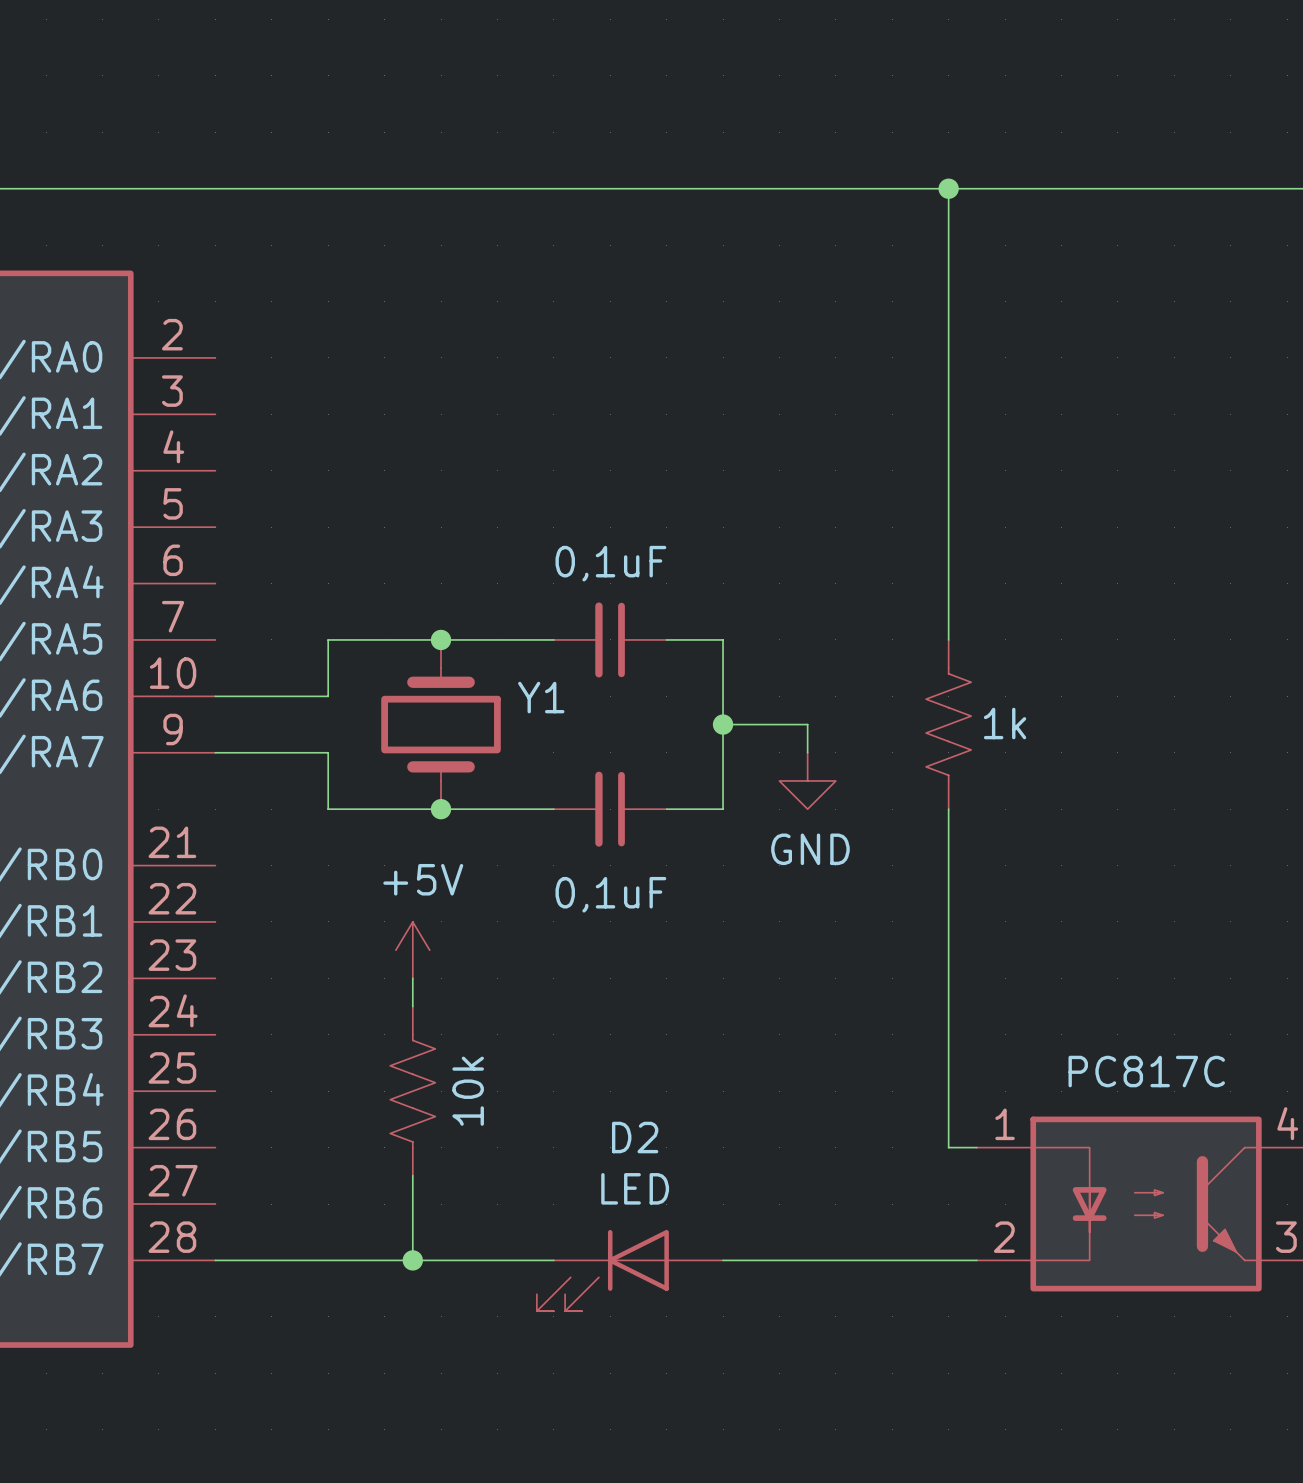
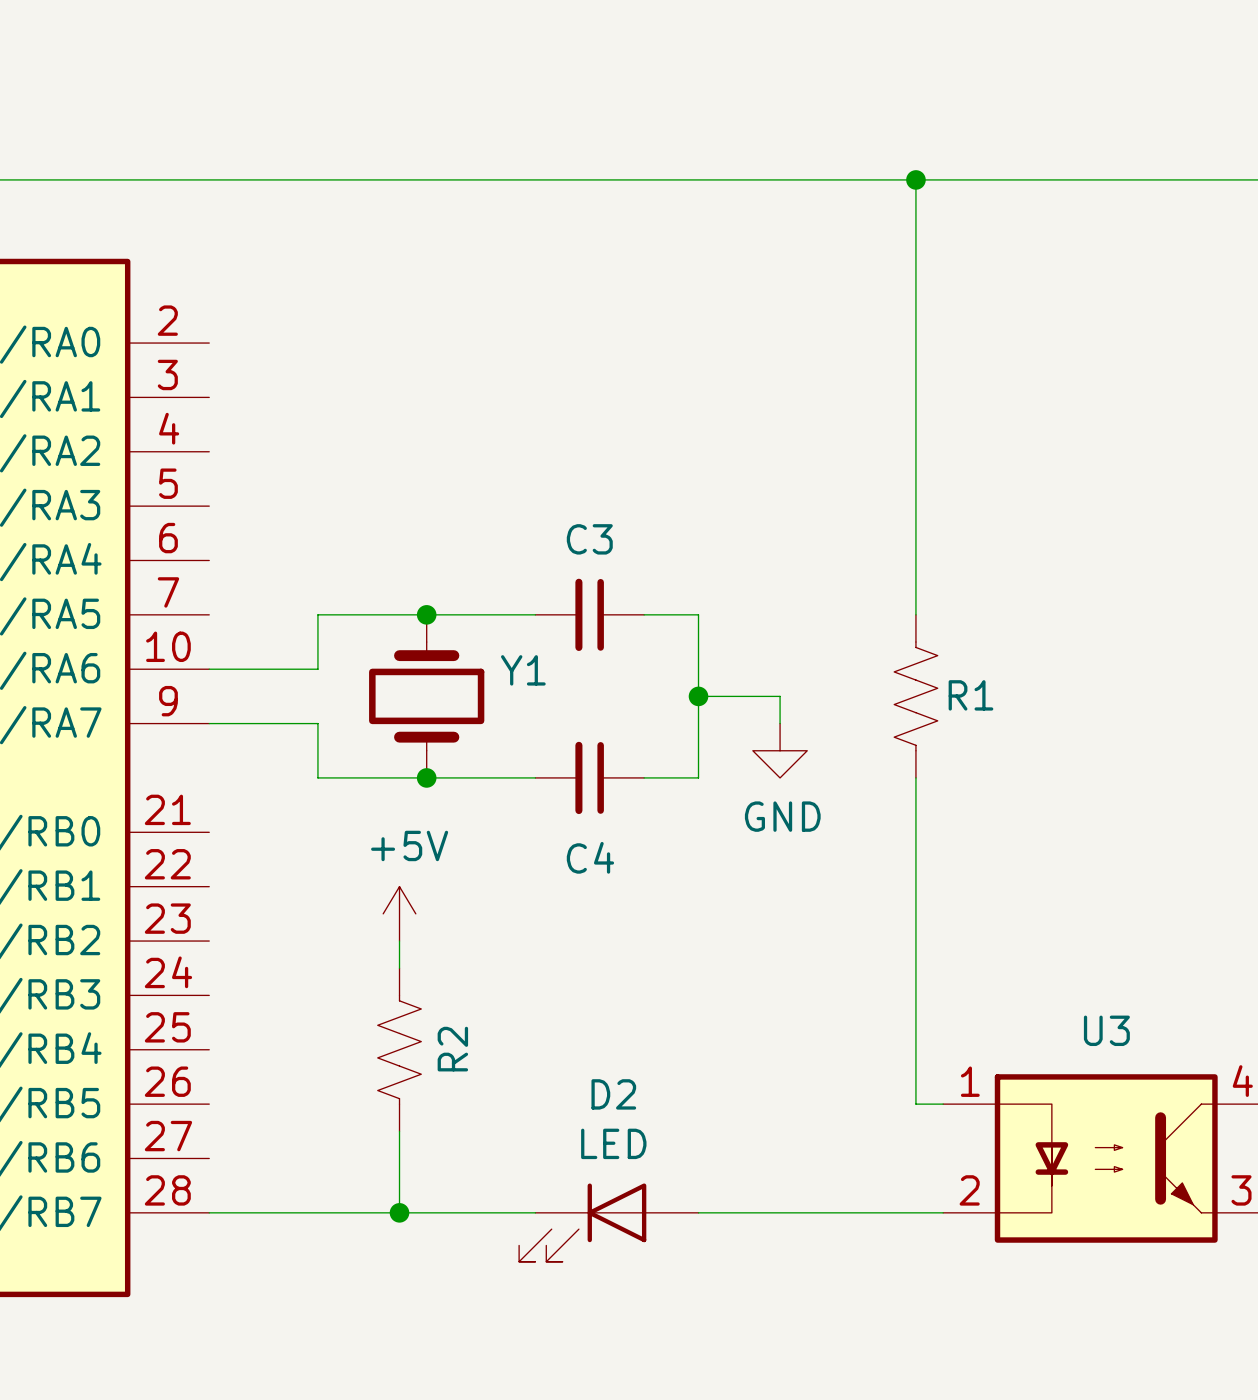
0,1uF name: 0,1uF (610, 563) -> C3 (589, 539)
1k name: 1k (1005, 723) -> R1 (970, 695)
0,1uF name: 0,1uF (610, 894) -> C4 (590, 857)
PC817C name: PC817C (1146, 1071) -> U3 (1106, 1030)
10k name: 10k (468, 1091) -> R2 (452, 1049)

